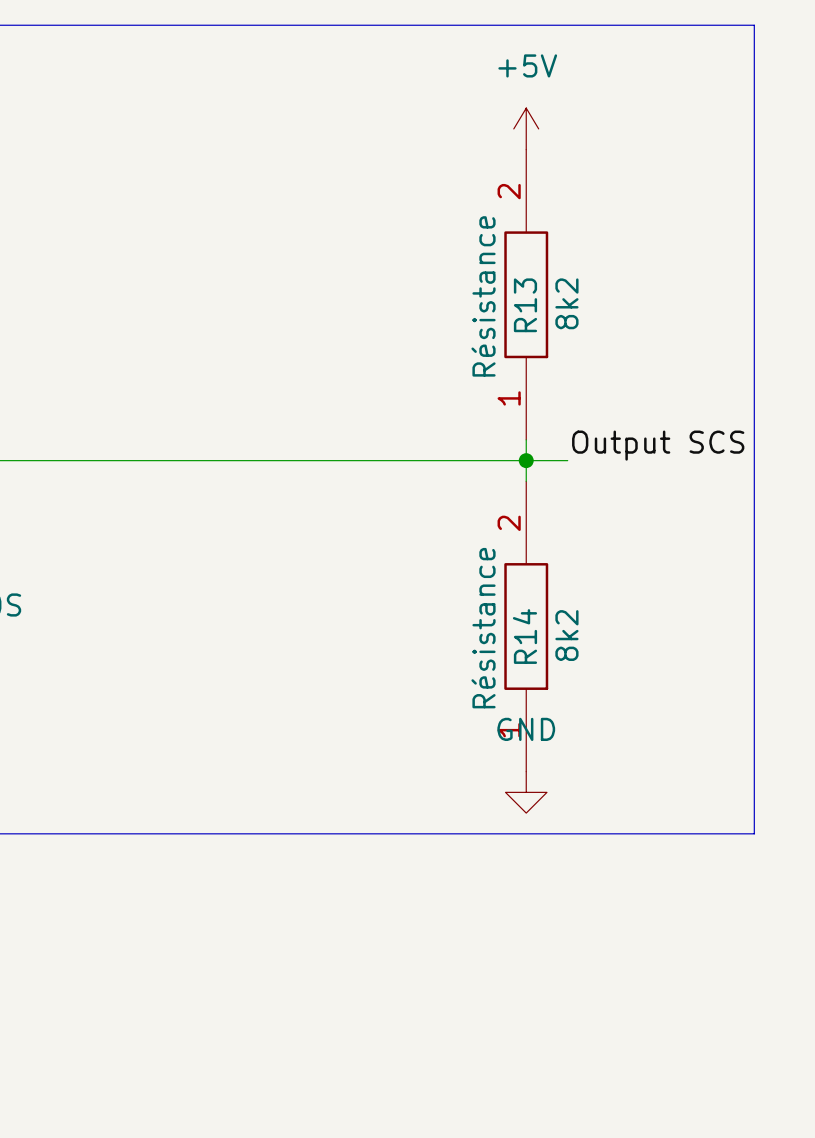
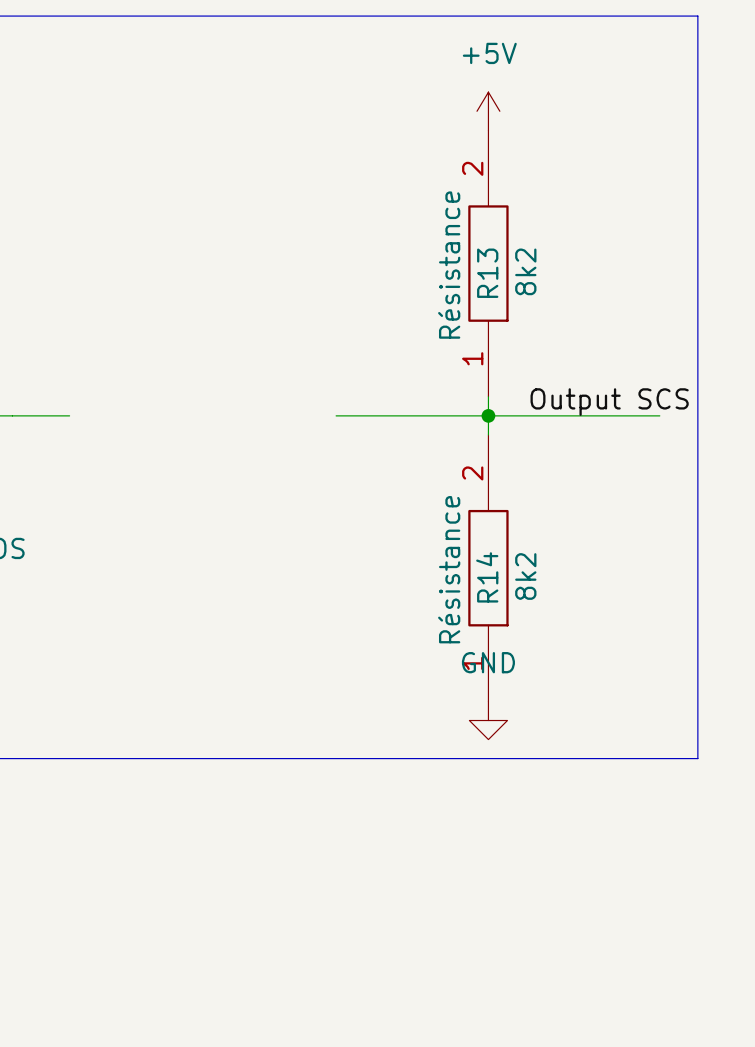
wire: (70, 460) (360, 460) -> none
wire: none -> (526, 415) (659, 415)

